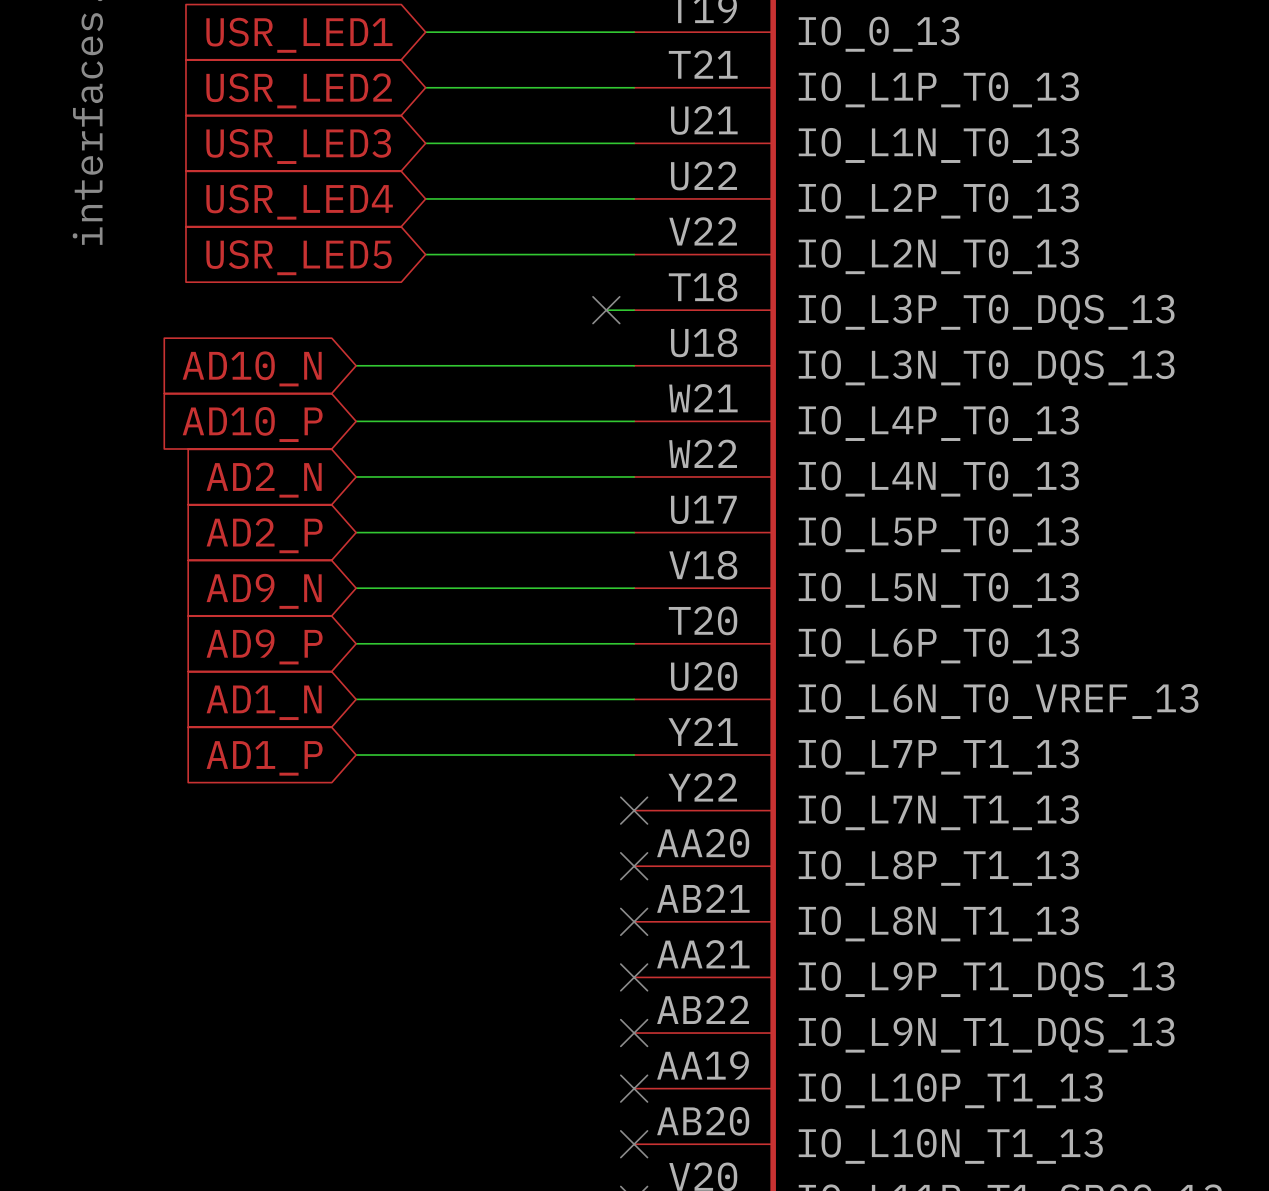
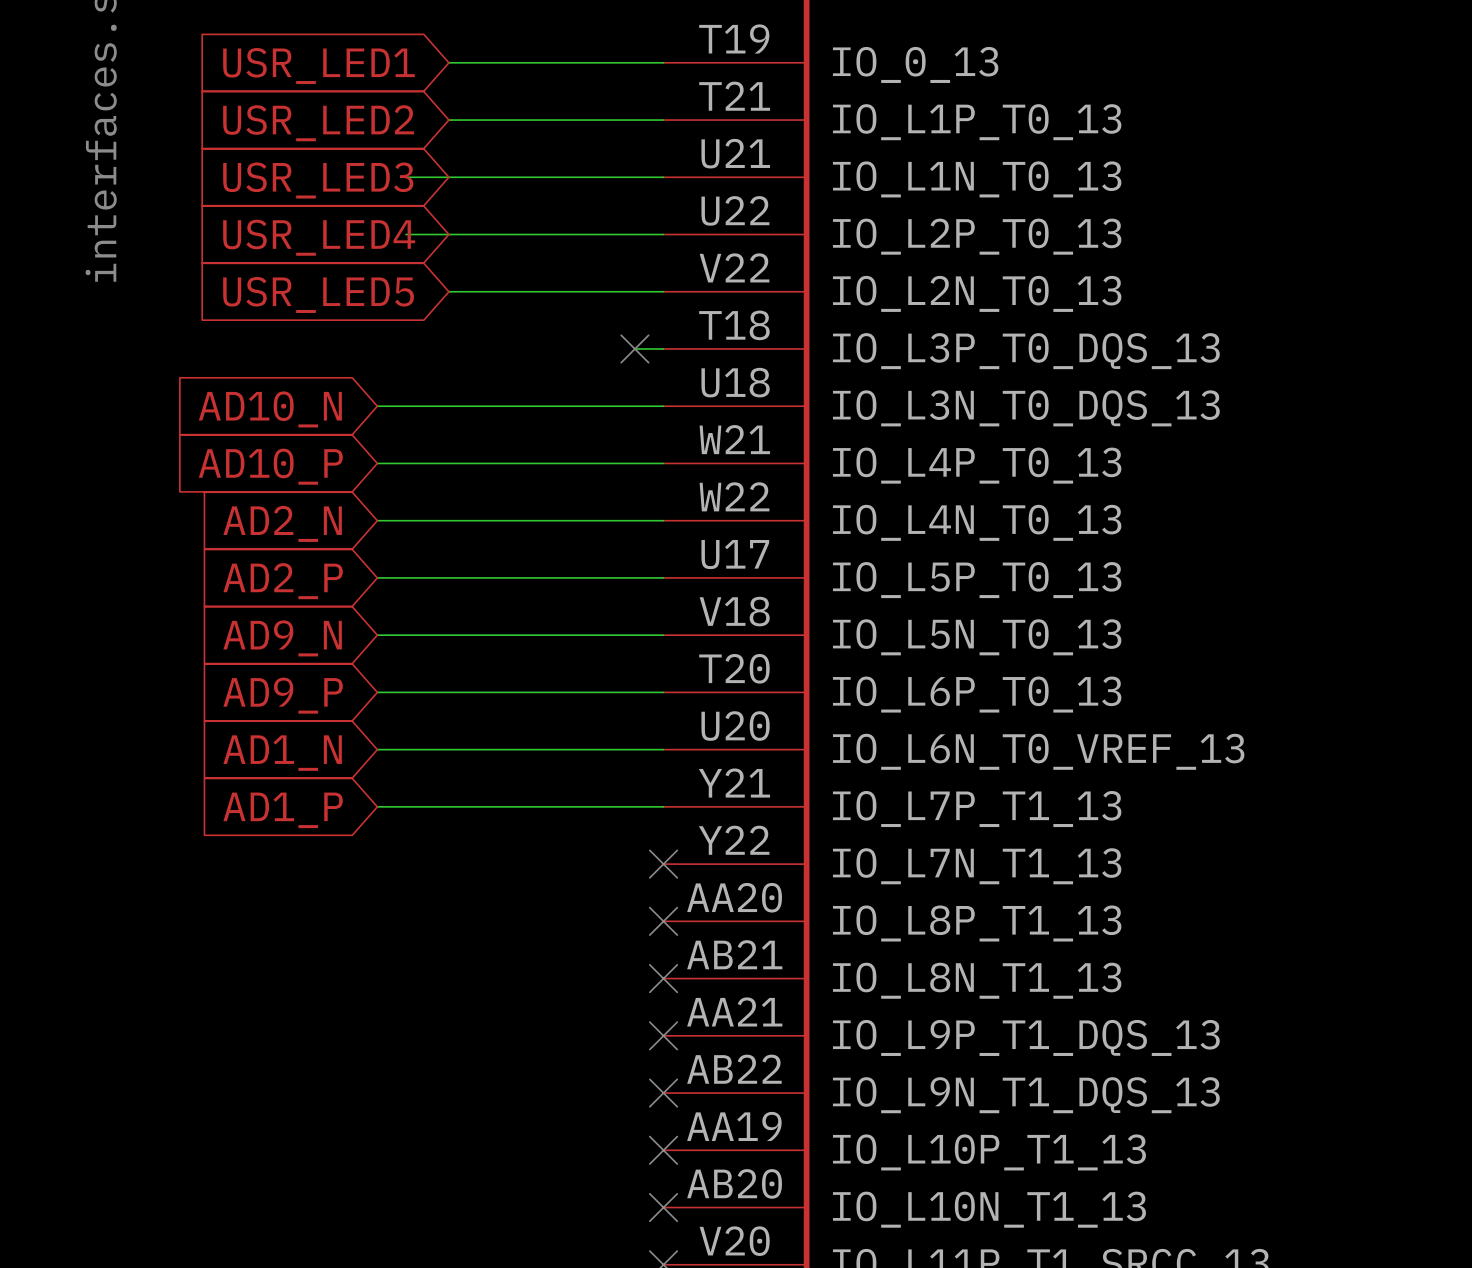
wire: none -> (405, 177) (448, 177)
wire: none -> (405, 234) (448, 234)

